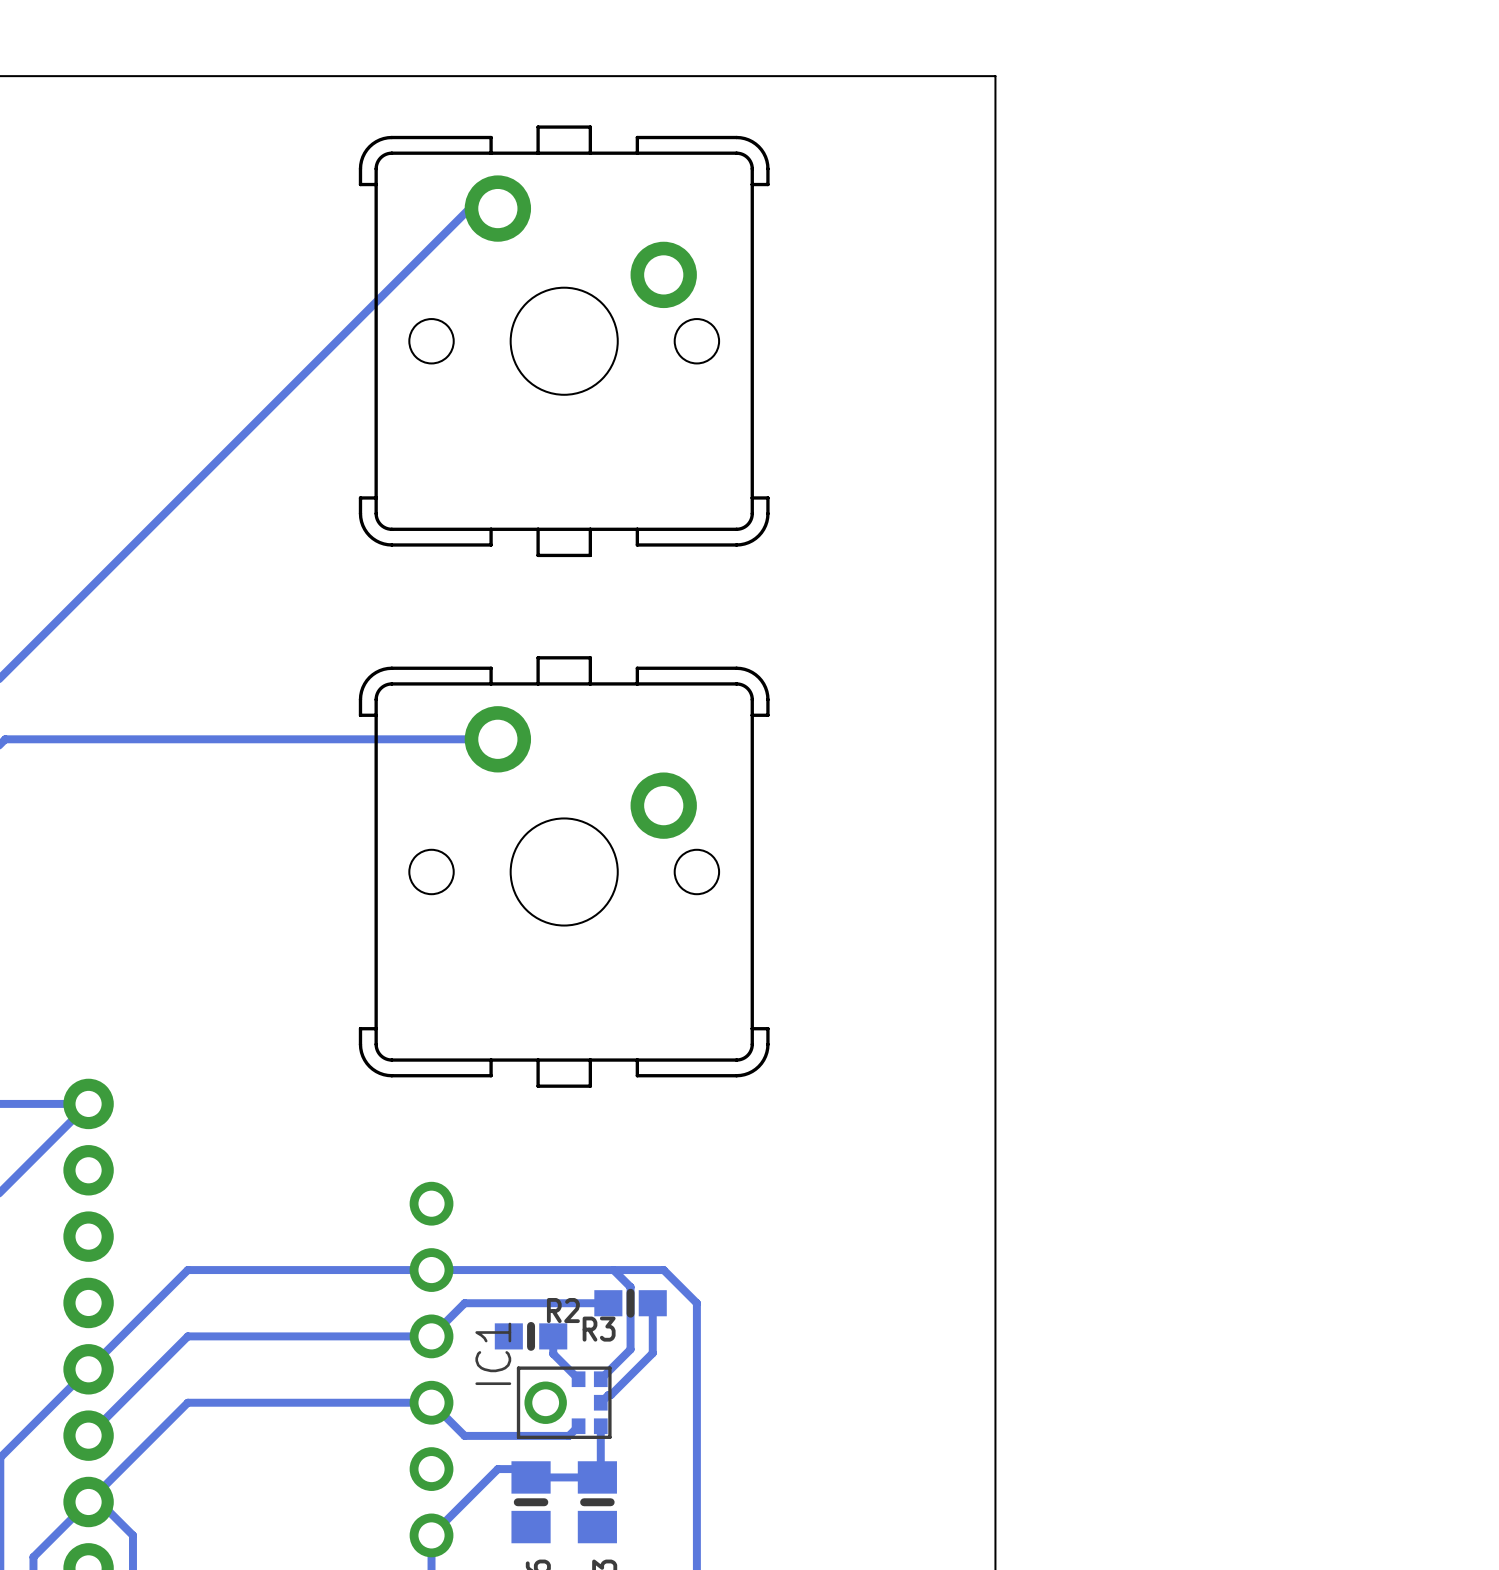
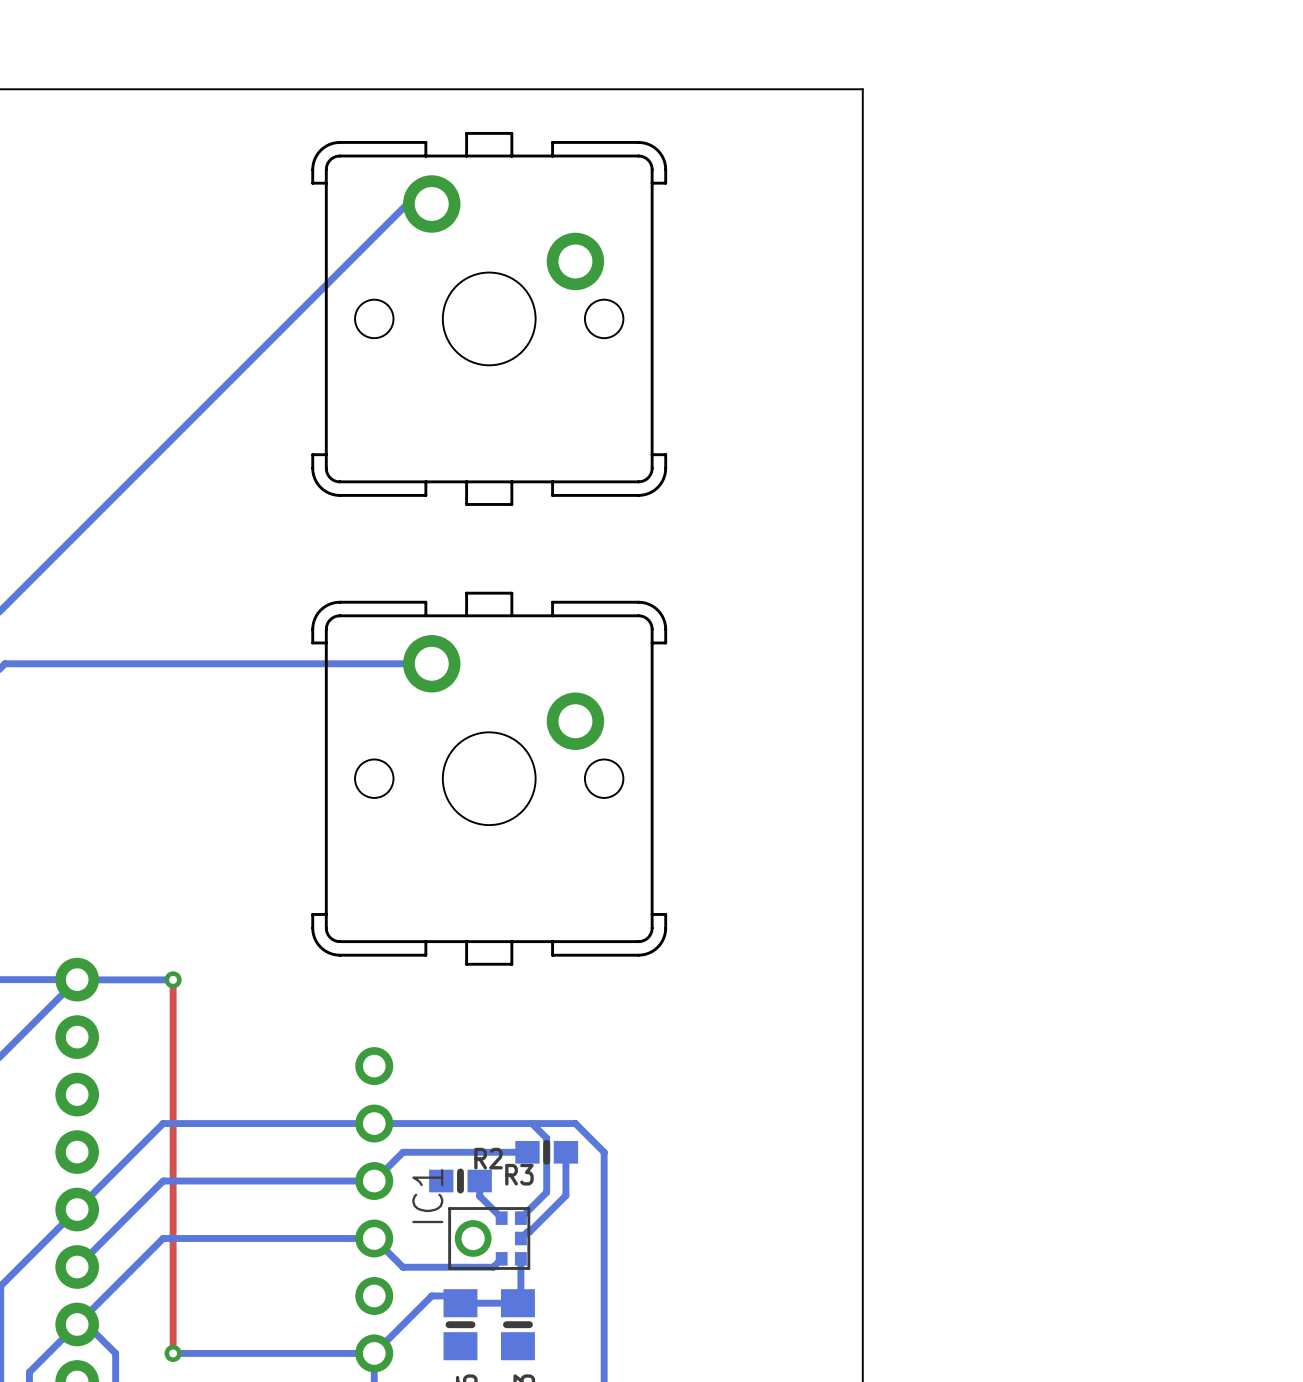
bottom track: none -> (173, 979) (77, 979)
top track: none -> (173, 979) (173, 1353)
via: none -> (173, 979)
via: none -> (173, 1353)
bottom track: none -> (374, 1353) (173, 1353)

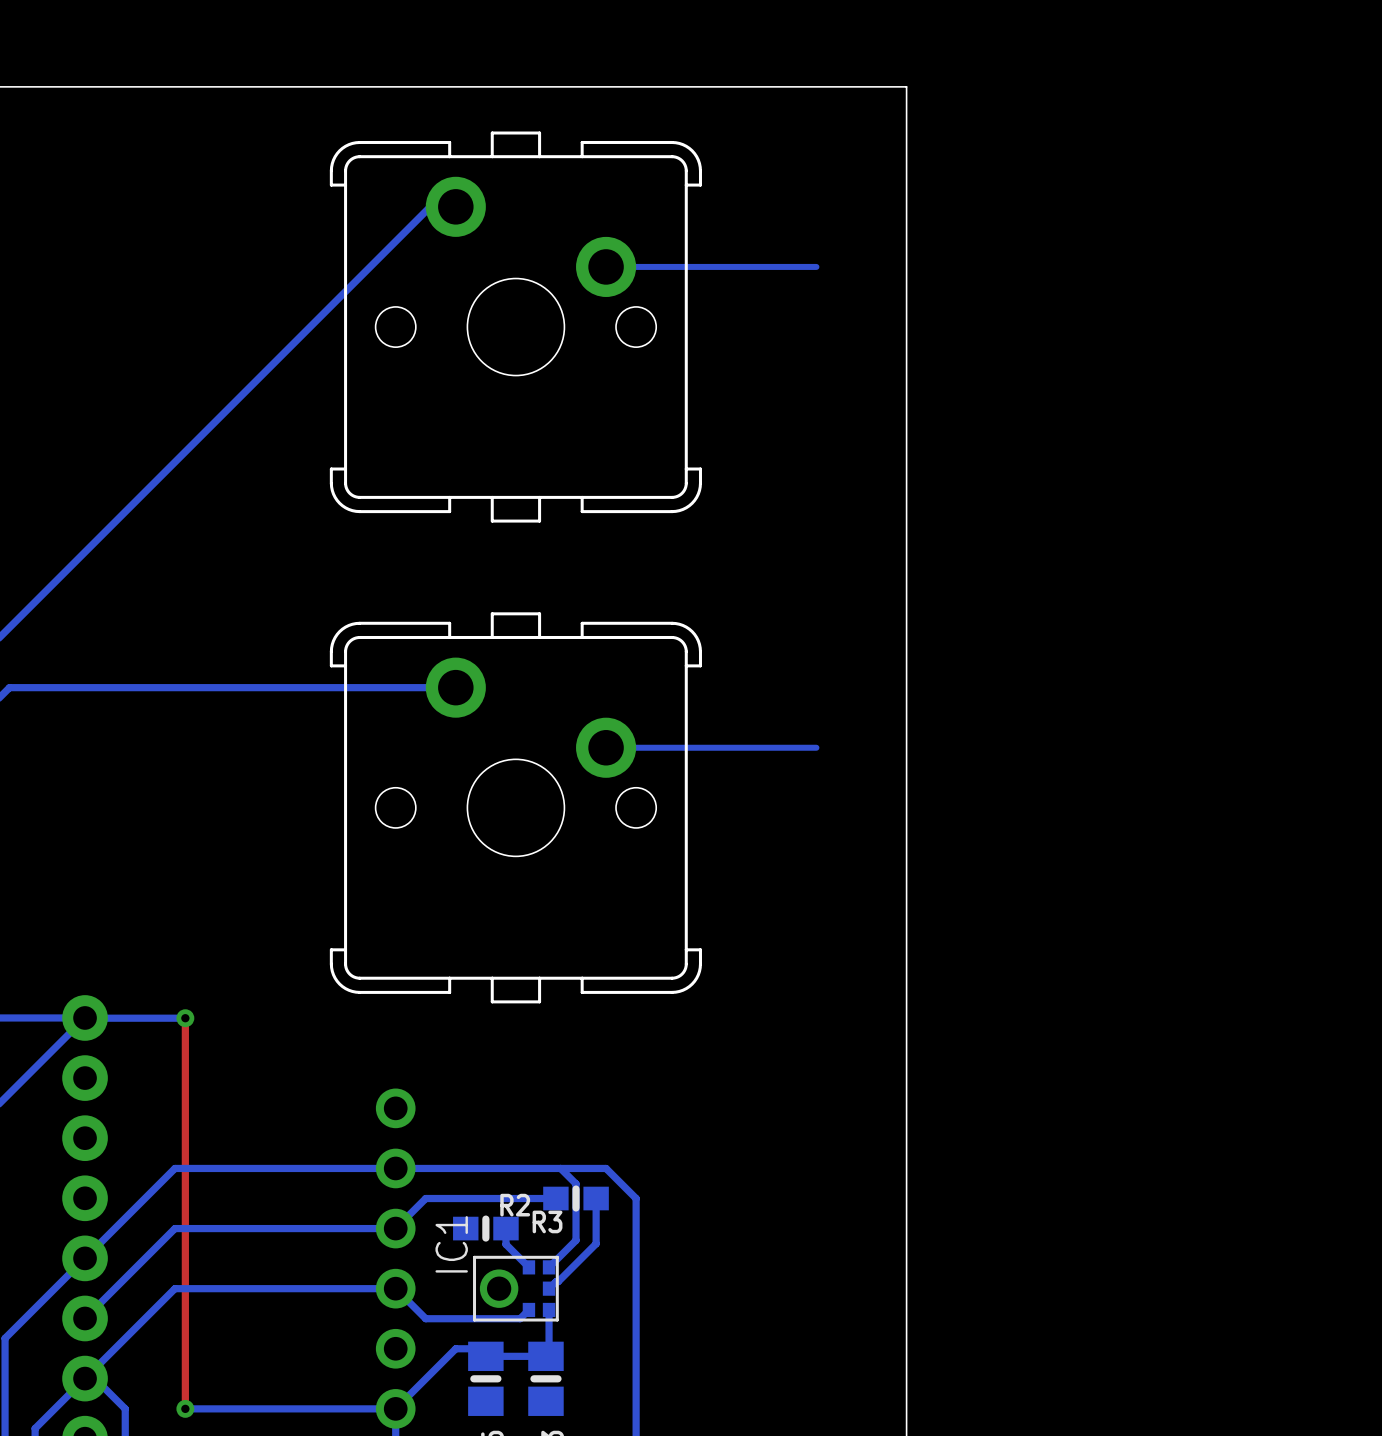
bottom track: none -> (816, 266) (606, 266)
bottom track: none -> (816, 747) (606, 747)

